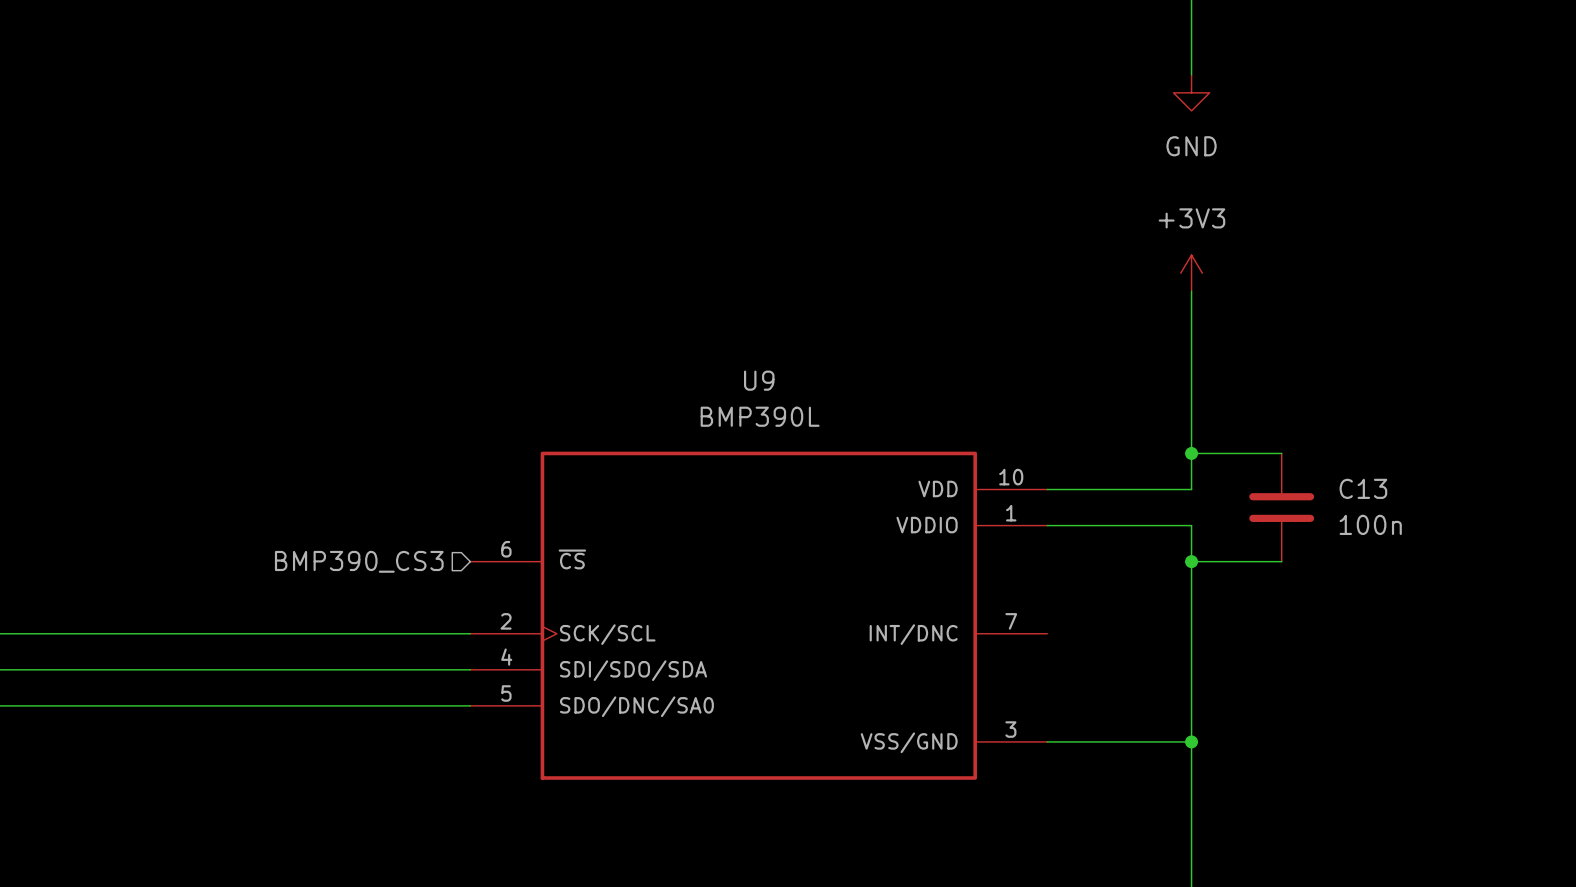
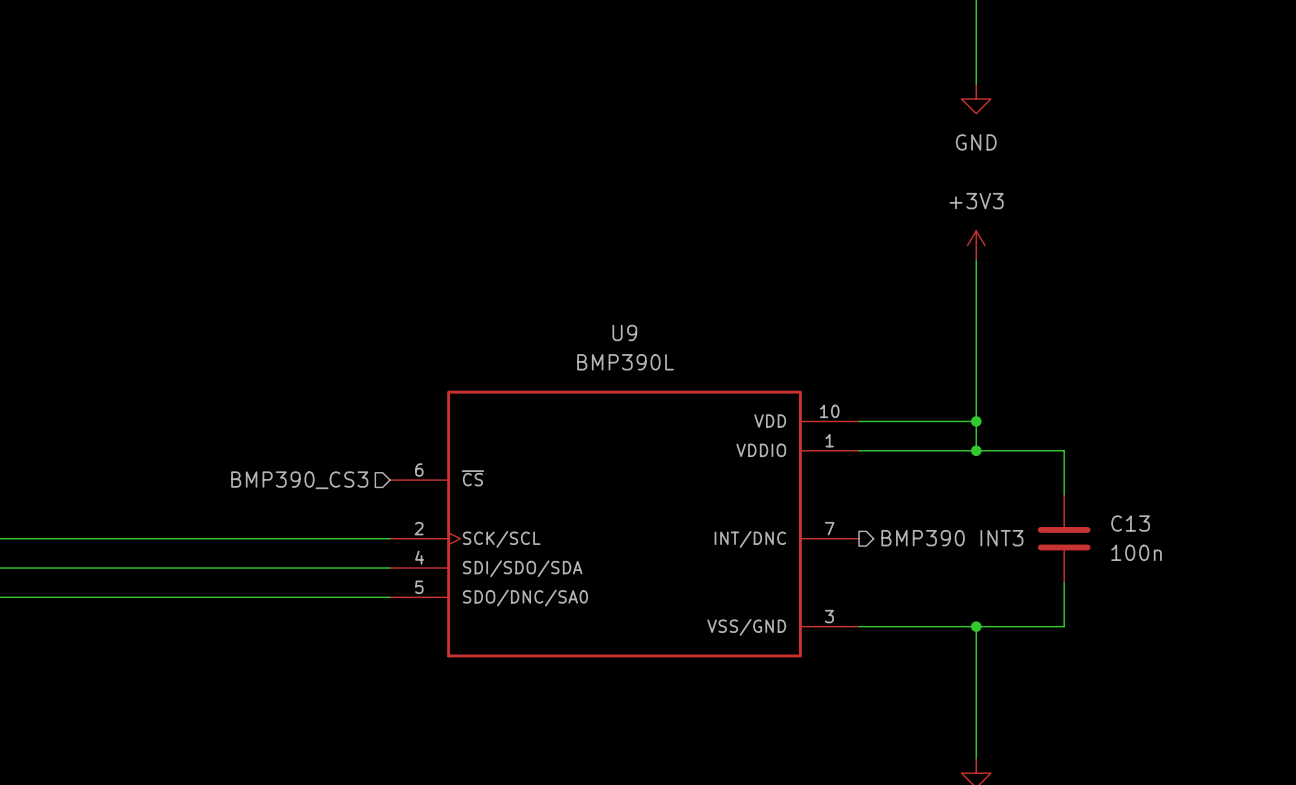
wire: (1191, 453) (1281, 453) -> none
junction: (1191, 453) -> none
wire: none -> (976, 421) (976, 450) (1064, 450) (1064, 494)
junction: none -> (976, 421)
C13 position: (1281, 507) -> (1064, 538)
wire: (1191, 525) (1191, 741) -> (1064, 582) (1064, 626) (976, 626)
junction: none -> (976, 450)
wire: (1191, 561) (1281, 561) -> none
junction: (1191, 561) -> none
hierarchical label: none -> BMP390 INT3 (952, 538)

